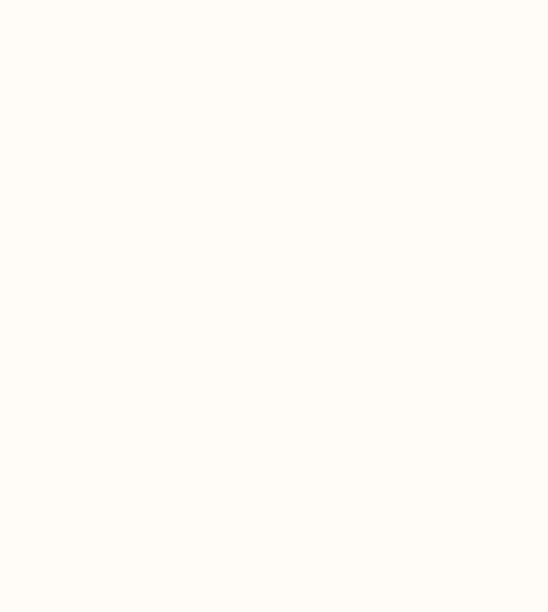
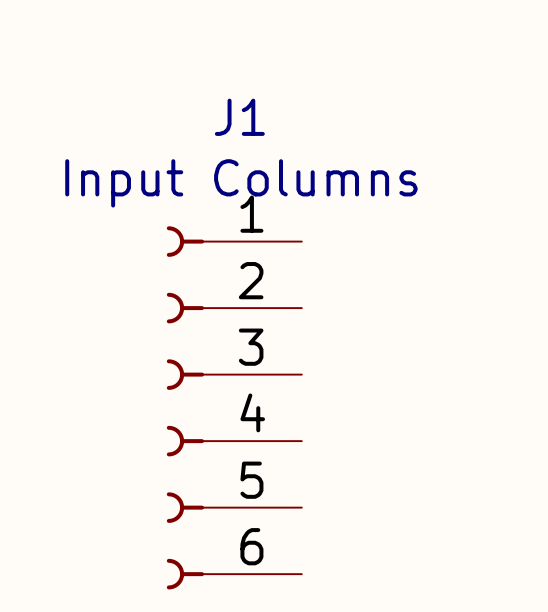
J1: none -> Input Columns (234, 407)

